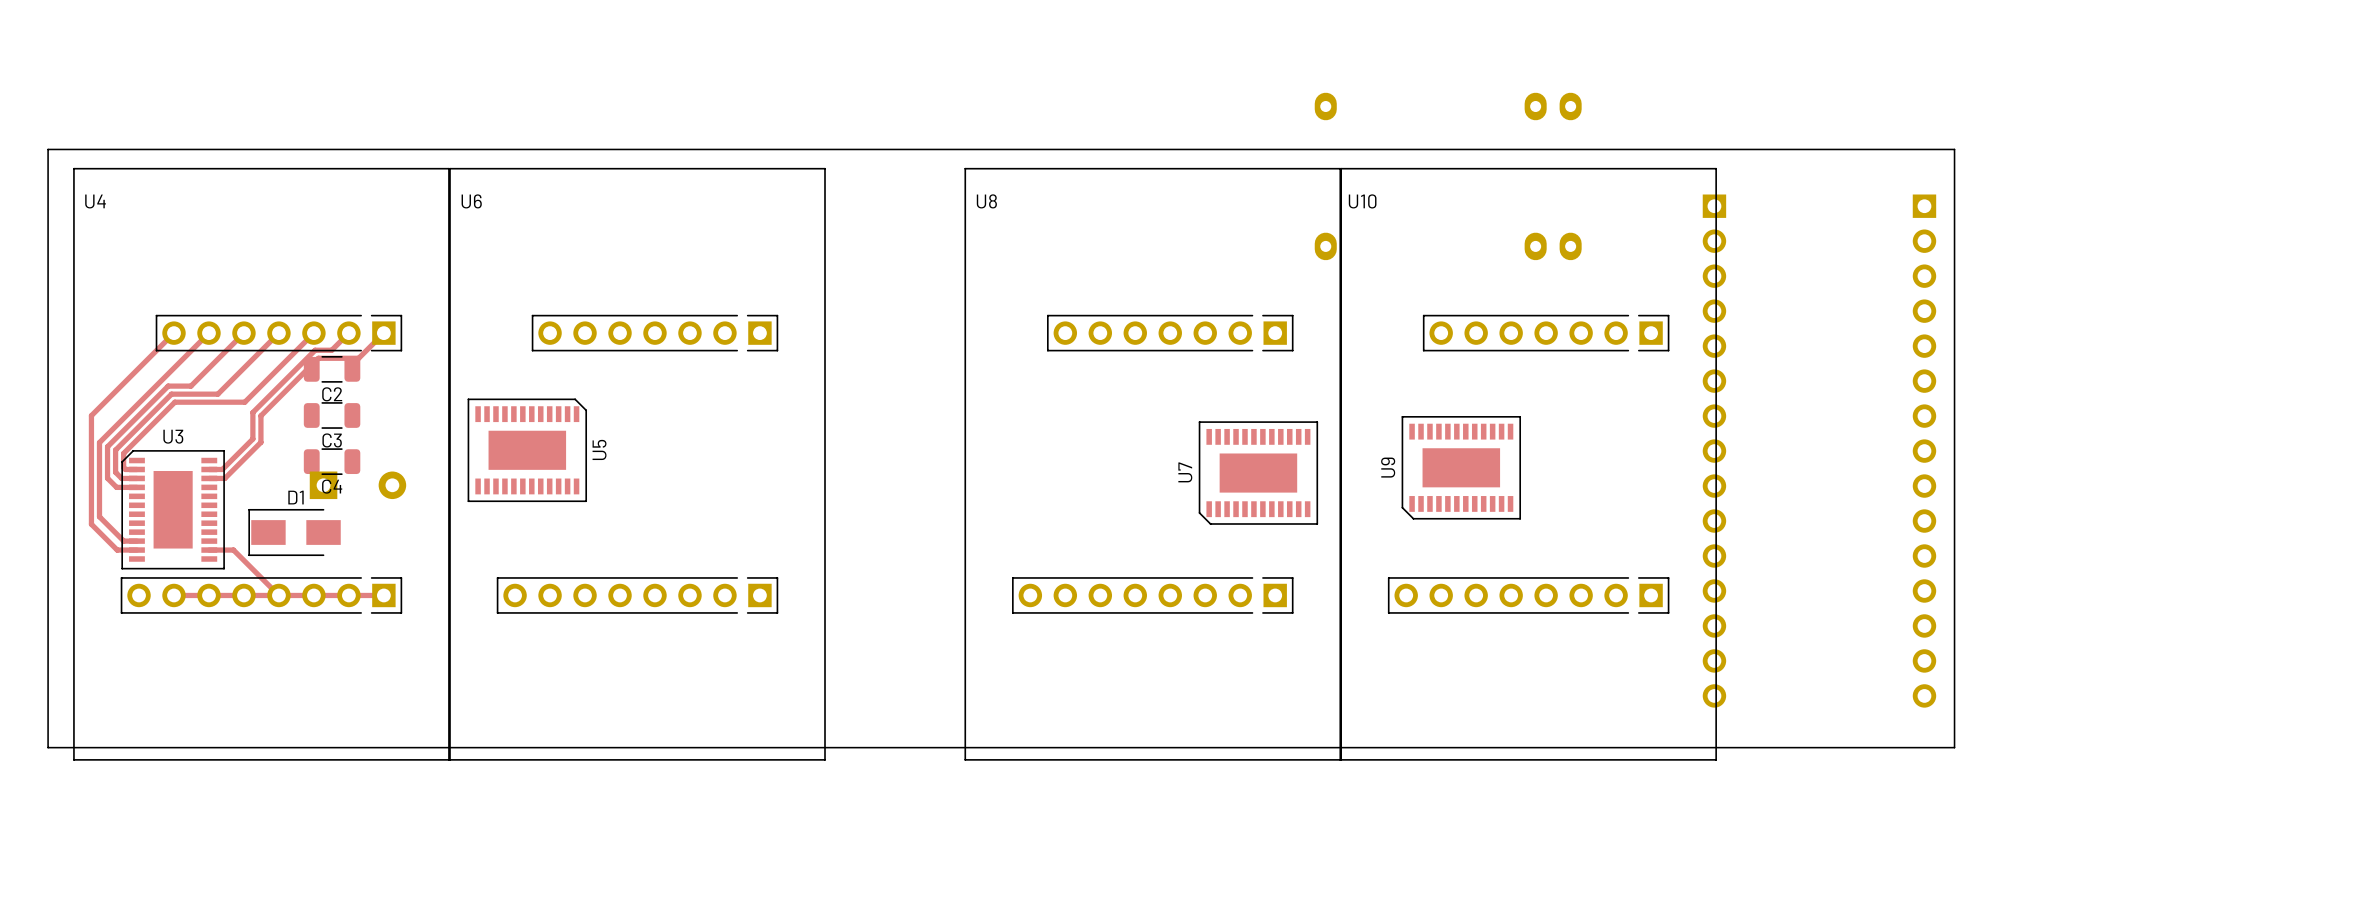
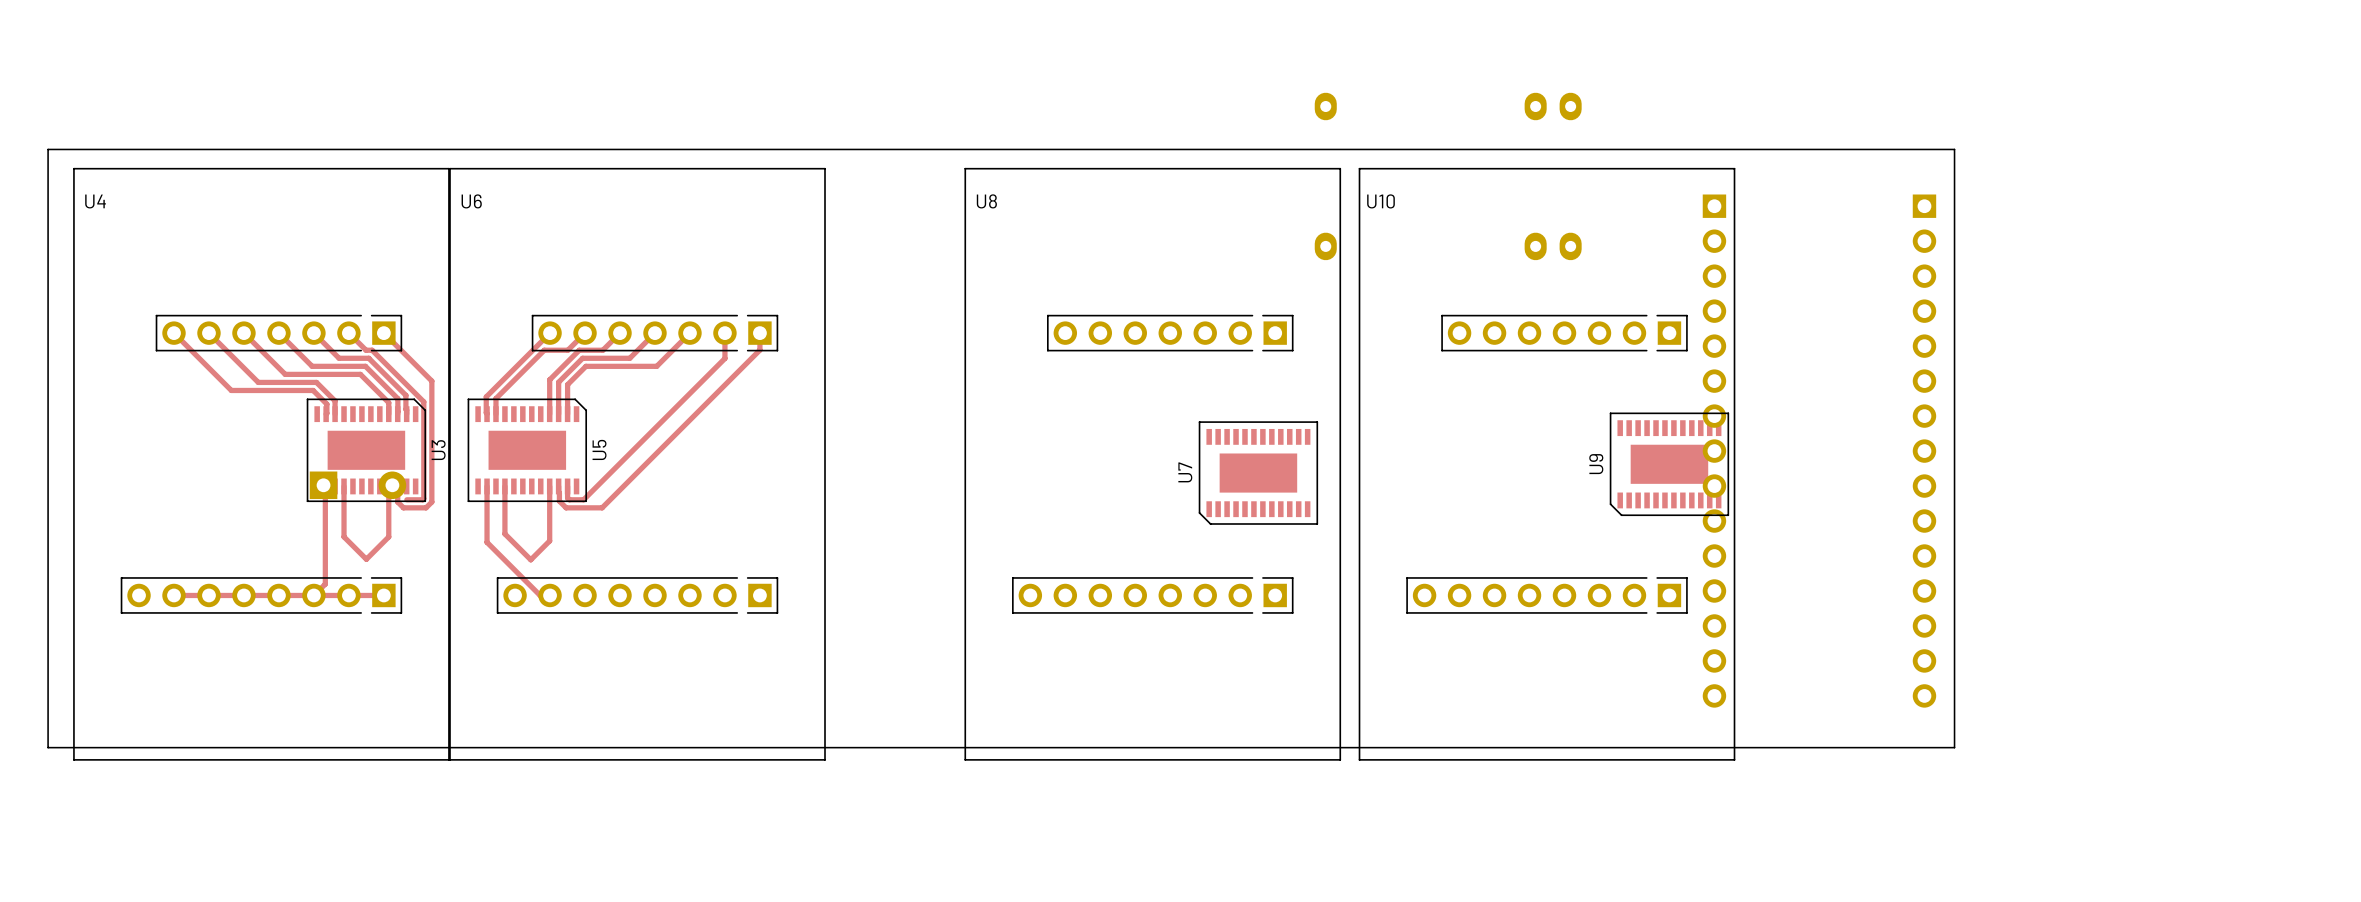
top track: (174, 333) (91, 415) (91, 524) (117, 550) (136, 550) -> (174, 333) (231, 390) (313, 390) (326, 404) (326, 414)
top track: (208, 333) (99, 442) (99, 516) (123, 541) (136, 541) -> (208, 333) (258, 382) (316, 382) (335, 400) (335, 414)
top track: (243, 333) (190, 386) (168, 386) (107, 446) (107, 478) (116, 487) (136, 487) -> (243, 333) (285, 374) (360, 374) (388, 402) (388, 414)
top track: (278, 333) (217, 394) (171, 394) (115, 450) (115, 472) (121, 478) (136, 478) -> (278, 333) (312, 366) (365, 366) (397, 398) (397, 414)
top track: (313, 333) (244, 402) (174, 402) (123, 453) (123, 467) (125, 469) (136, 469) -> none
top track: (348, 333) (331, 350) (315, 350) (252, 412) (252, 439) (222, 469) (209, 469) -> (348, 333) (366, 350) (372, 350) (423, 401) (423, 498) (406, 499)
top track: (383, 333) (358, 358) -> (406, 414) (405, 395) (368, 358) (358, 358)
top track: none -> (383, 333) (431, 381) (431, 502) (426, 507) (403, 507) (397, 502) (397, 486)
top track: none -> (550, 333) (486, 396) (487, 414)
top track: none -> (585, 333) (567, 350) (544, 350) (495, 398) (495, 414)
top track: none -> (620, 333) (602, 350) (579, 350) (549, 379) (549, 414)
top track: none -> (654, 333) (629, 358) (582, 358) (558, 382) (558, 414)
top track: none -> (689, 333) (656, 366) (585, 366) (567, 384) (567, 414)
top track: none -> (724, 333) (724, 358) (583, 499) (569, 499) (567, 497) (567, 486)
top track: none -> (759, 333) (759, 350) (602, 507) (566, 507) (559, 501) (558, 486)
top track: (339, 358) (318, 358) (260, 415) (260, 442) (224, 478) (209, 478) -> (339, 358) (313, 333)
C2: (332, 369) -> none
C3: (332, 415) -> none
C4: (332, 461) -> none
U10 position: (1528, 464) -> (1547, 464)
U9 position: (1461, 467) -> (1669, 464)
top track: none -> (326, 486) (325, 584) (313, 595)
top track: none -> (344, 486) (344, 536) (366, 559) (388, 536) (388, 486)
top track: none -> (487, 486) (487, 542) (540, 595) (550, 595)
top track: none -> (504, 486) (504, 533) (530, 559) (549, 540) (549, 486)
U3 rotation: 0° (173, 509) -> 90° clockwise (366, 450)
U3 position: (173, 509) -> (366, 450)
D1: (294, 532) -> none
top track: (209, 550) (233, 550) (278, 595) -> none

